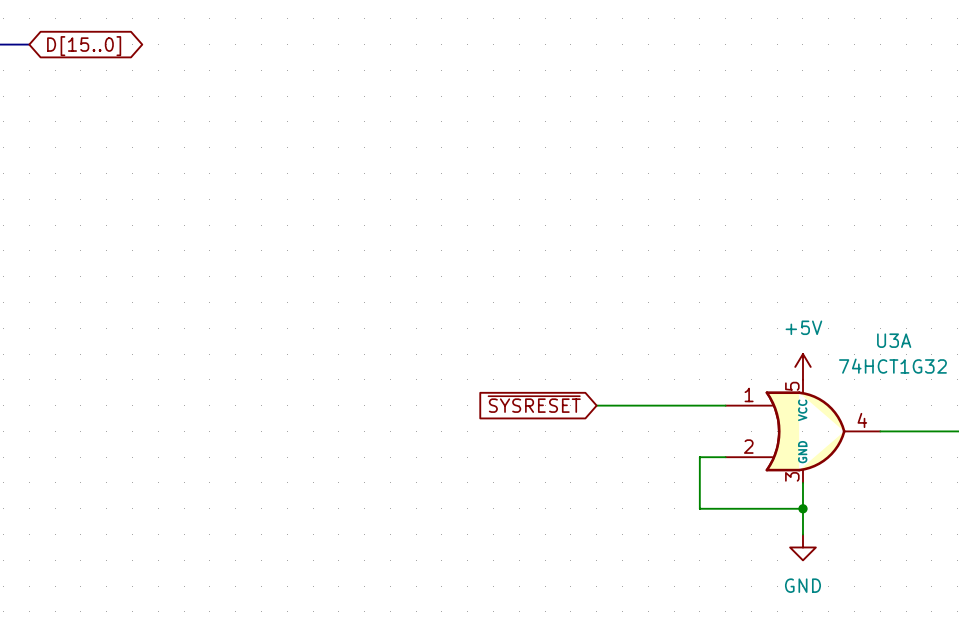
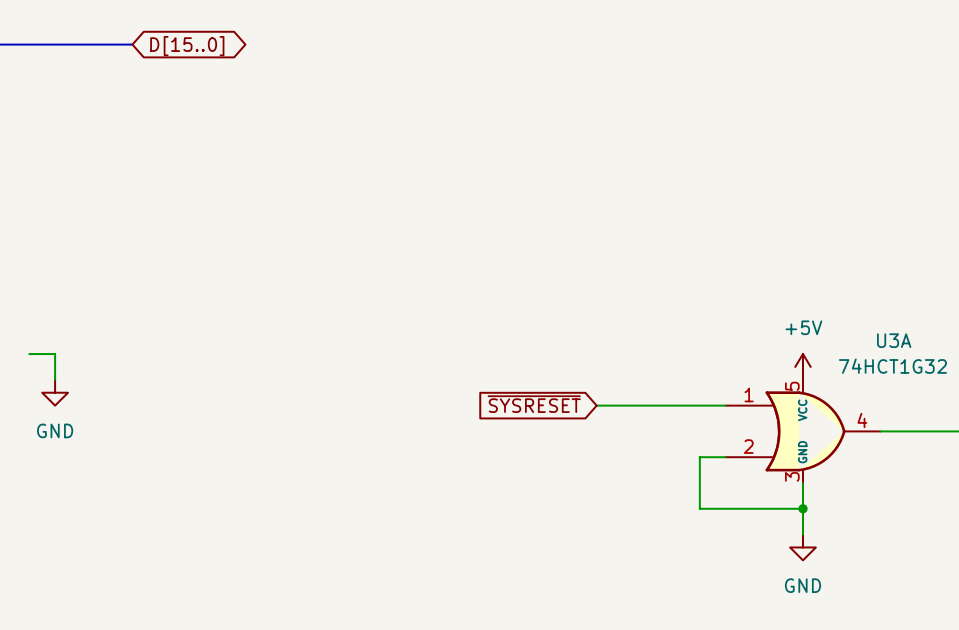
bus: none -> (29, 44) (132, 44)
global label position: D[15..0] (84, 46) -> D[15..0] (187, 46)
wire: none -> (29, 354) (55, 354) (55, 379)
power symbol: none -> GND (55, 392)

